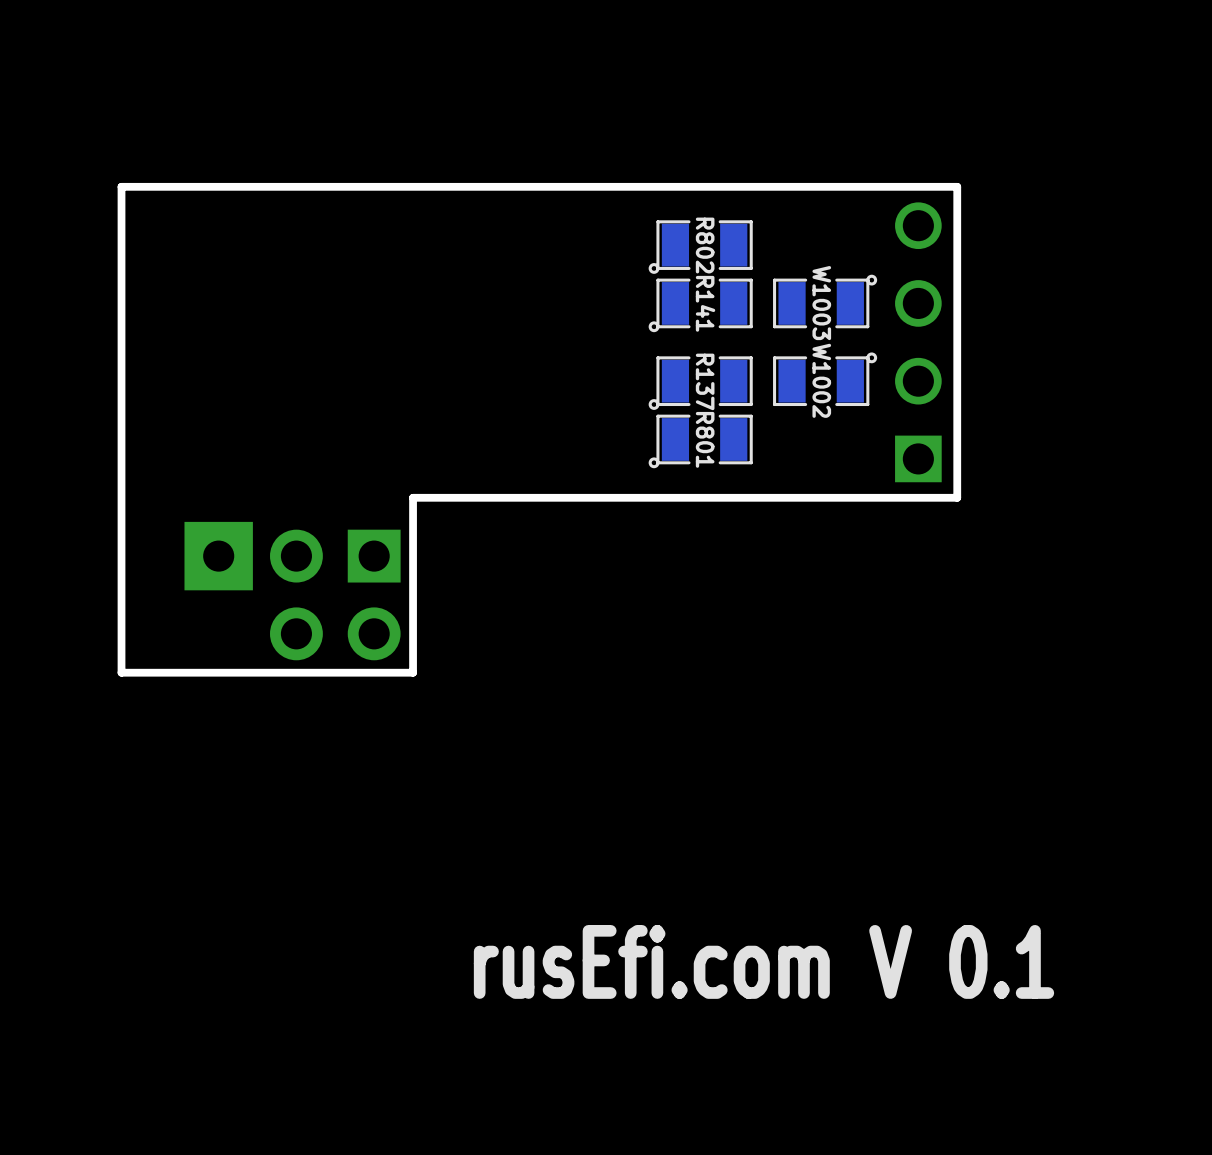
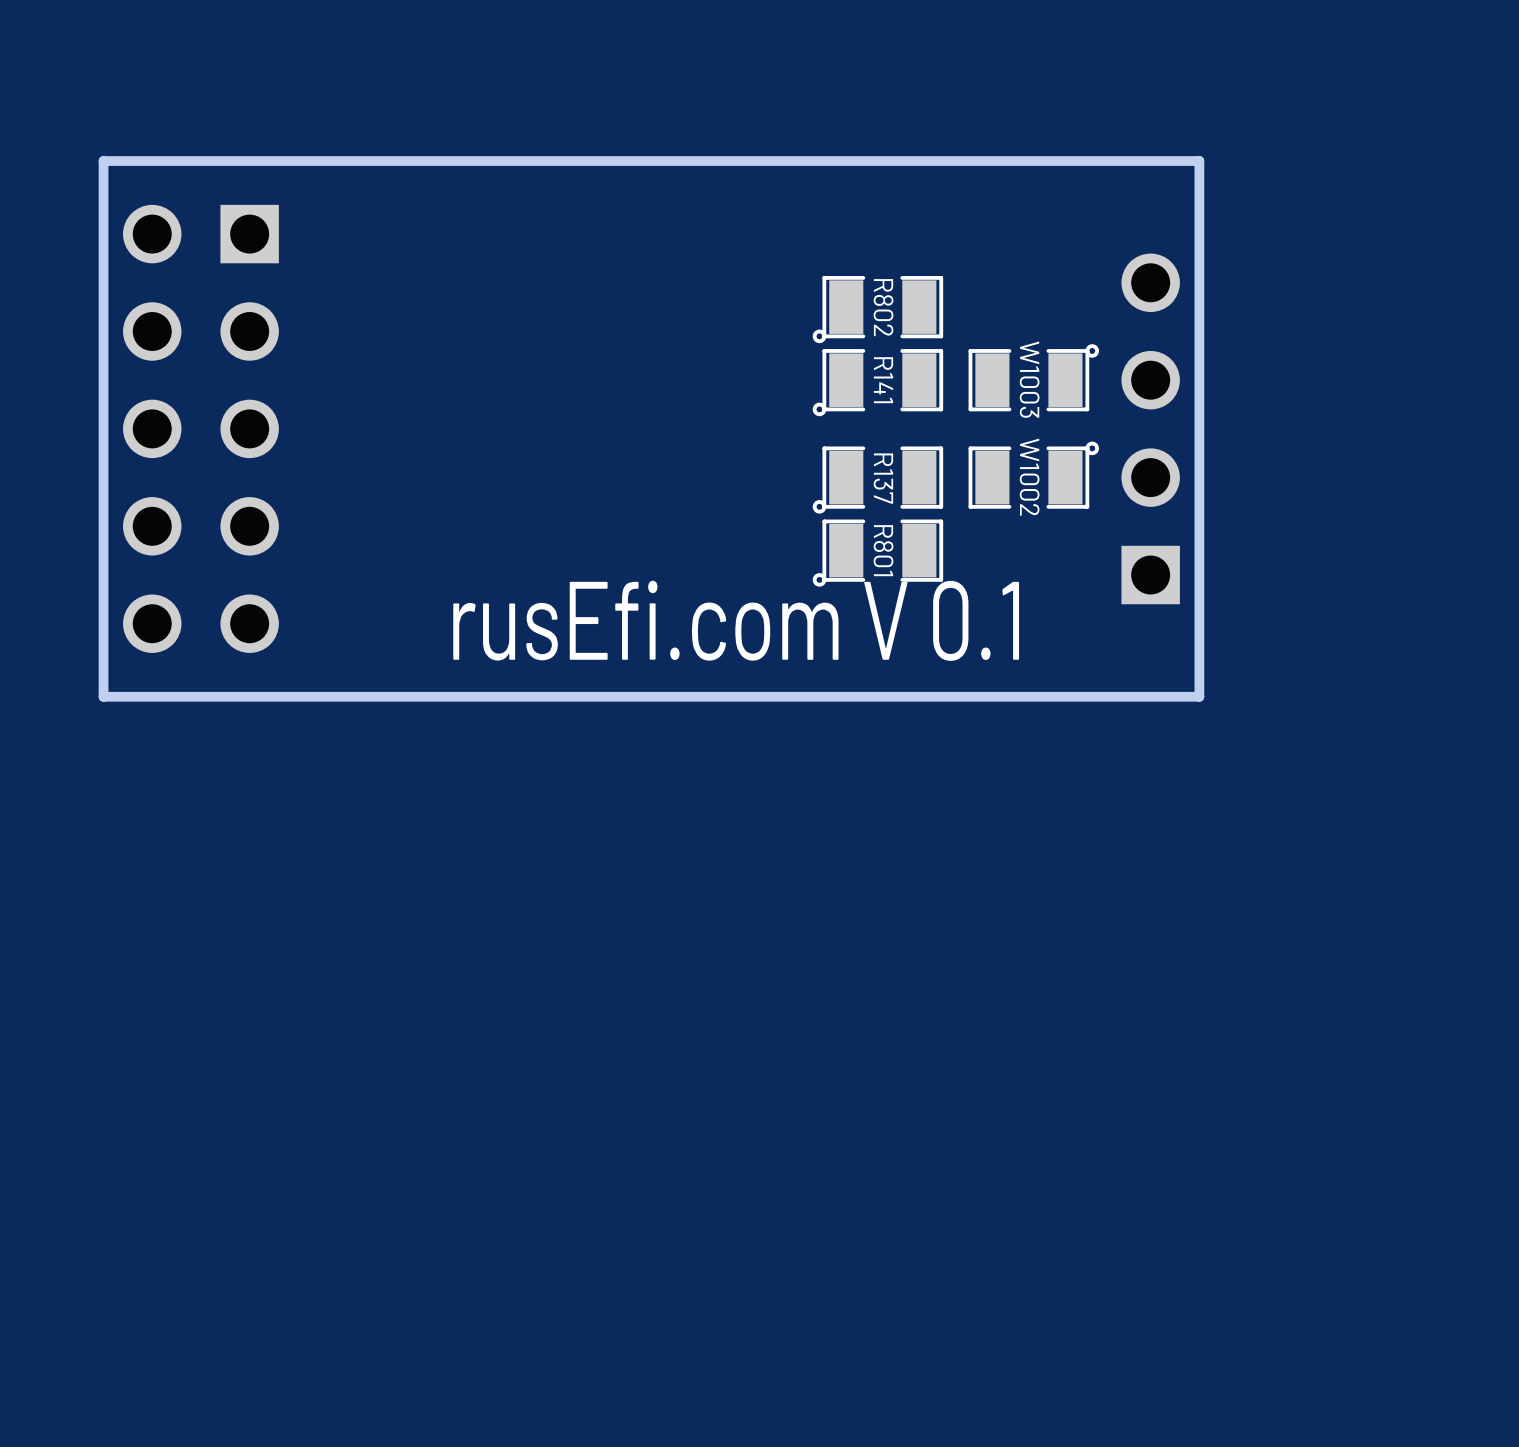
board edge: (957, 186) (121, 186) (121, 672) (413, 672) (413, 497) (957, 497) -> (1199, 234) (1199, 161) (103, 161) (103, 696) (1199, 696) (1199, 623)
part: none -> (200, 428)
part: (218, 556) -> none
part: (335, 594) -> none
text position: rusEfi.com V 0.1 (764, 961) -> rusEfi.com V 0.1 (736, 620)

